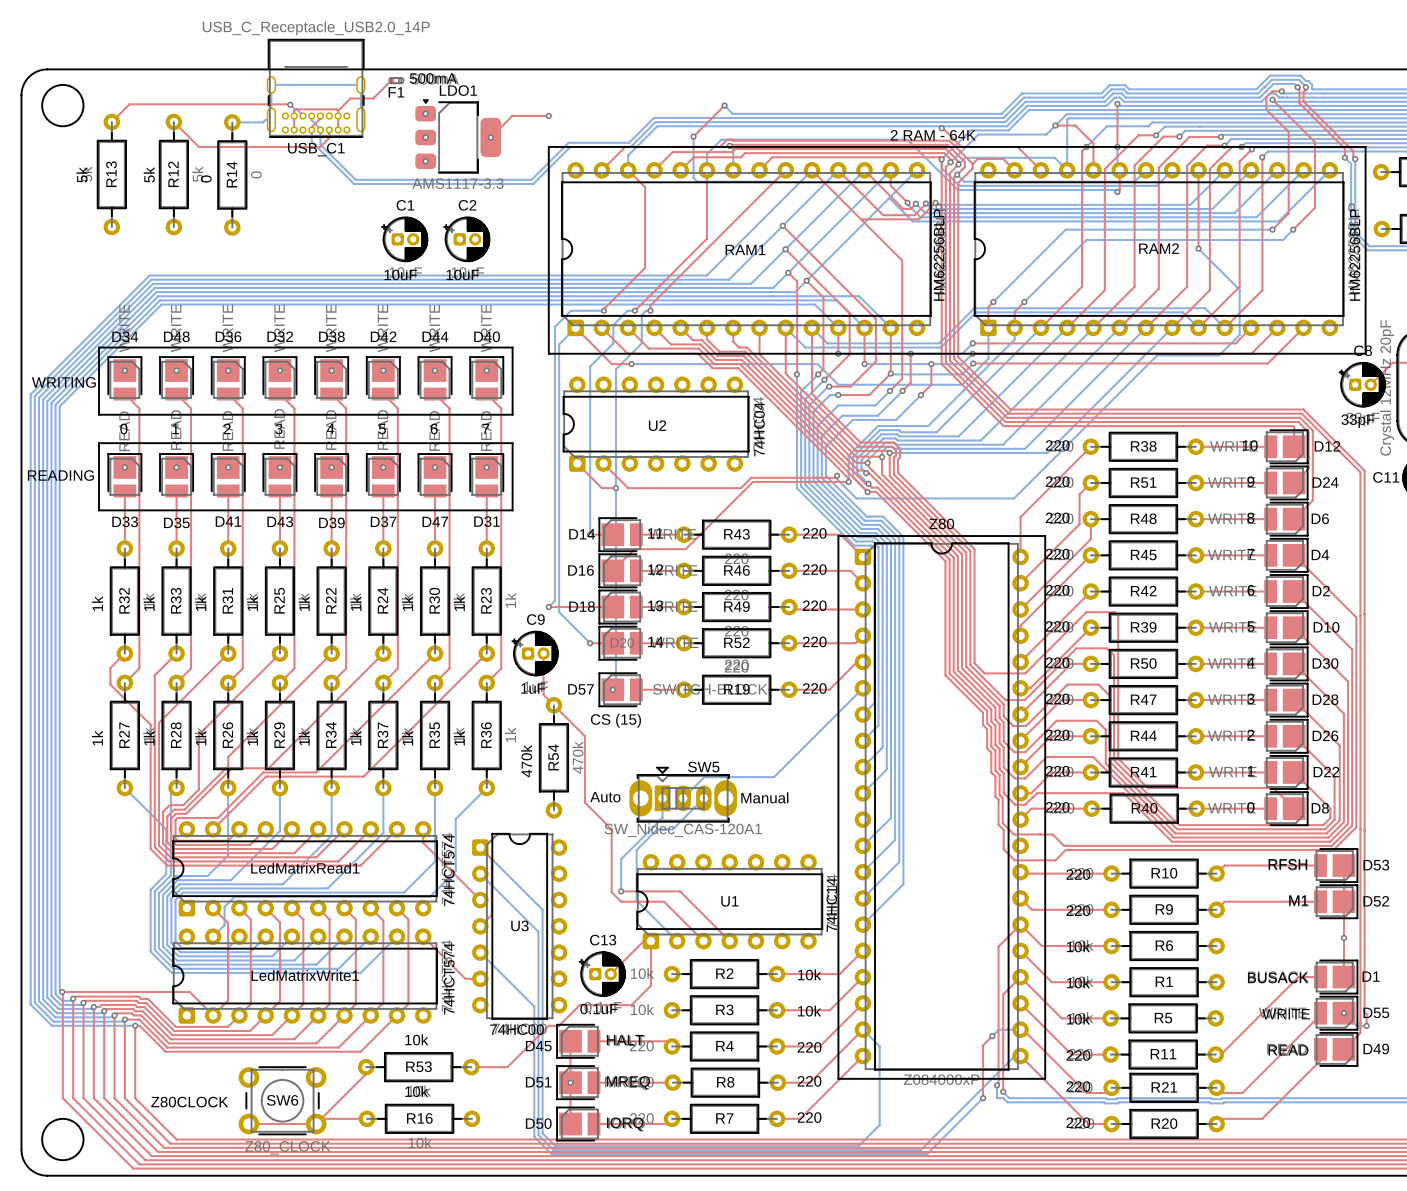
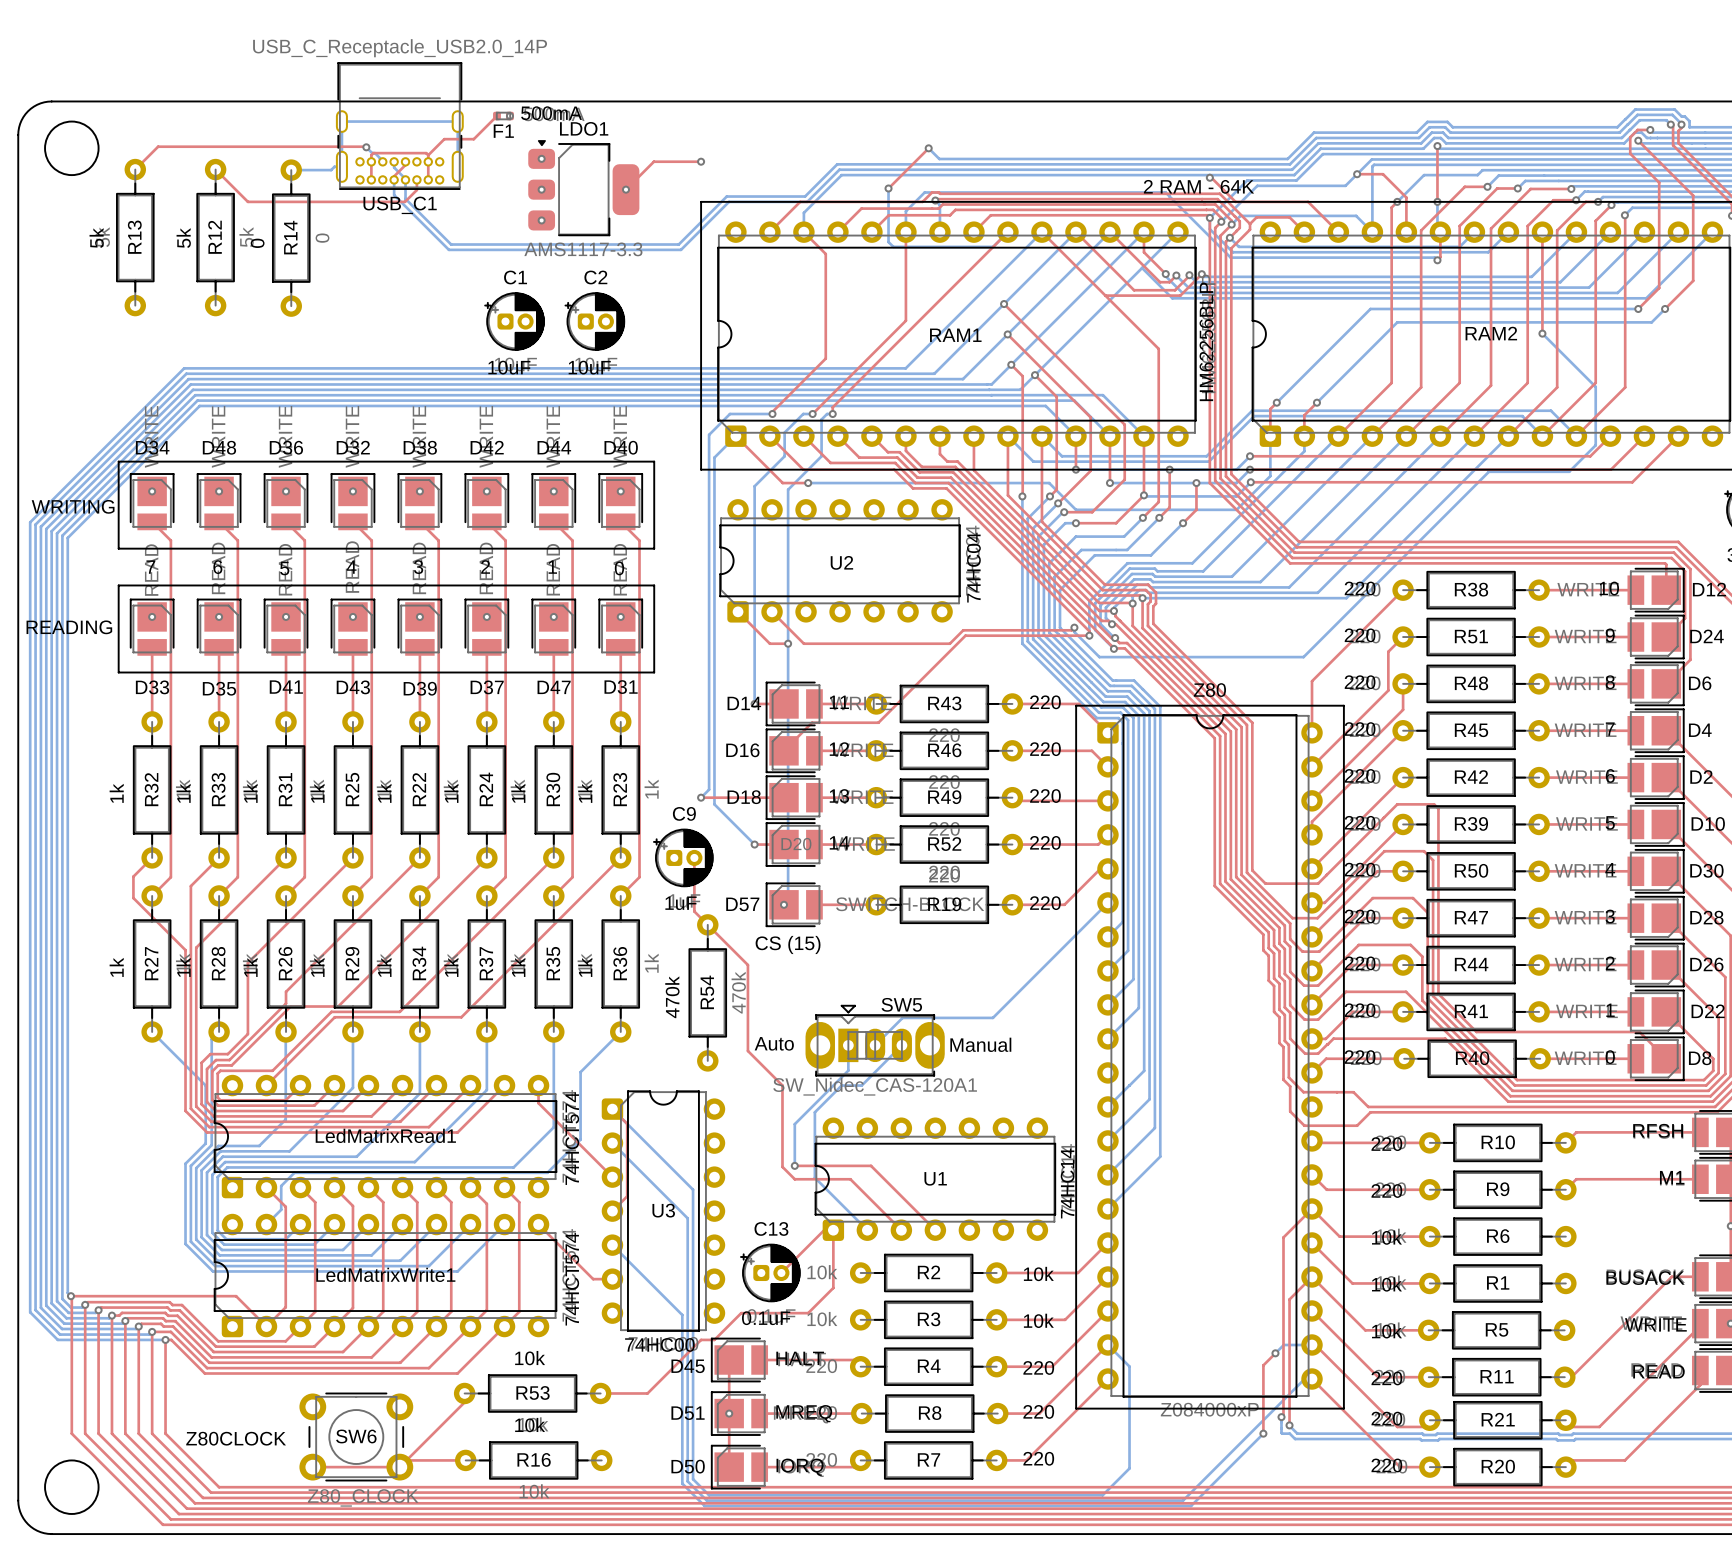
text: 0 (123, 428) -> 7 (150, 567)
text: 1 (175, 428) -> 6 (217, 567)
text: 2 (227, 428) -> 5 (284, 568)
text: 3 (278, 428) -> 4 (351, 567)
text: 4 (330, 428) -> 3 (418, 567)
text: 6 (434, 428) -> 1 (552, 567)
text: 7 (485, 428) -> 0 (619, 568)
text: 5 (382, 429) -> 2 (485, 566)

